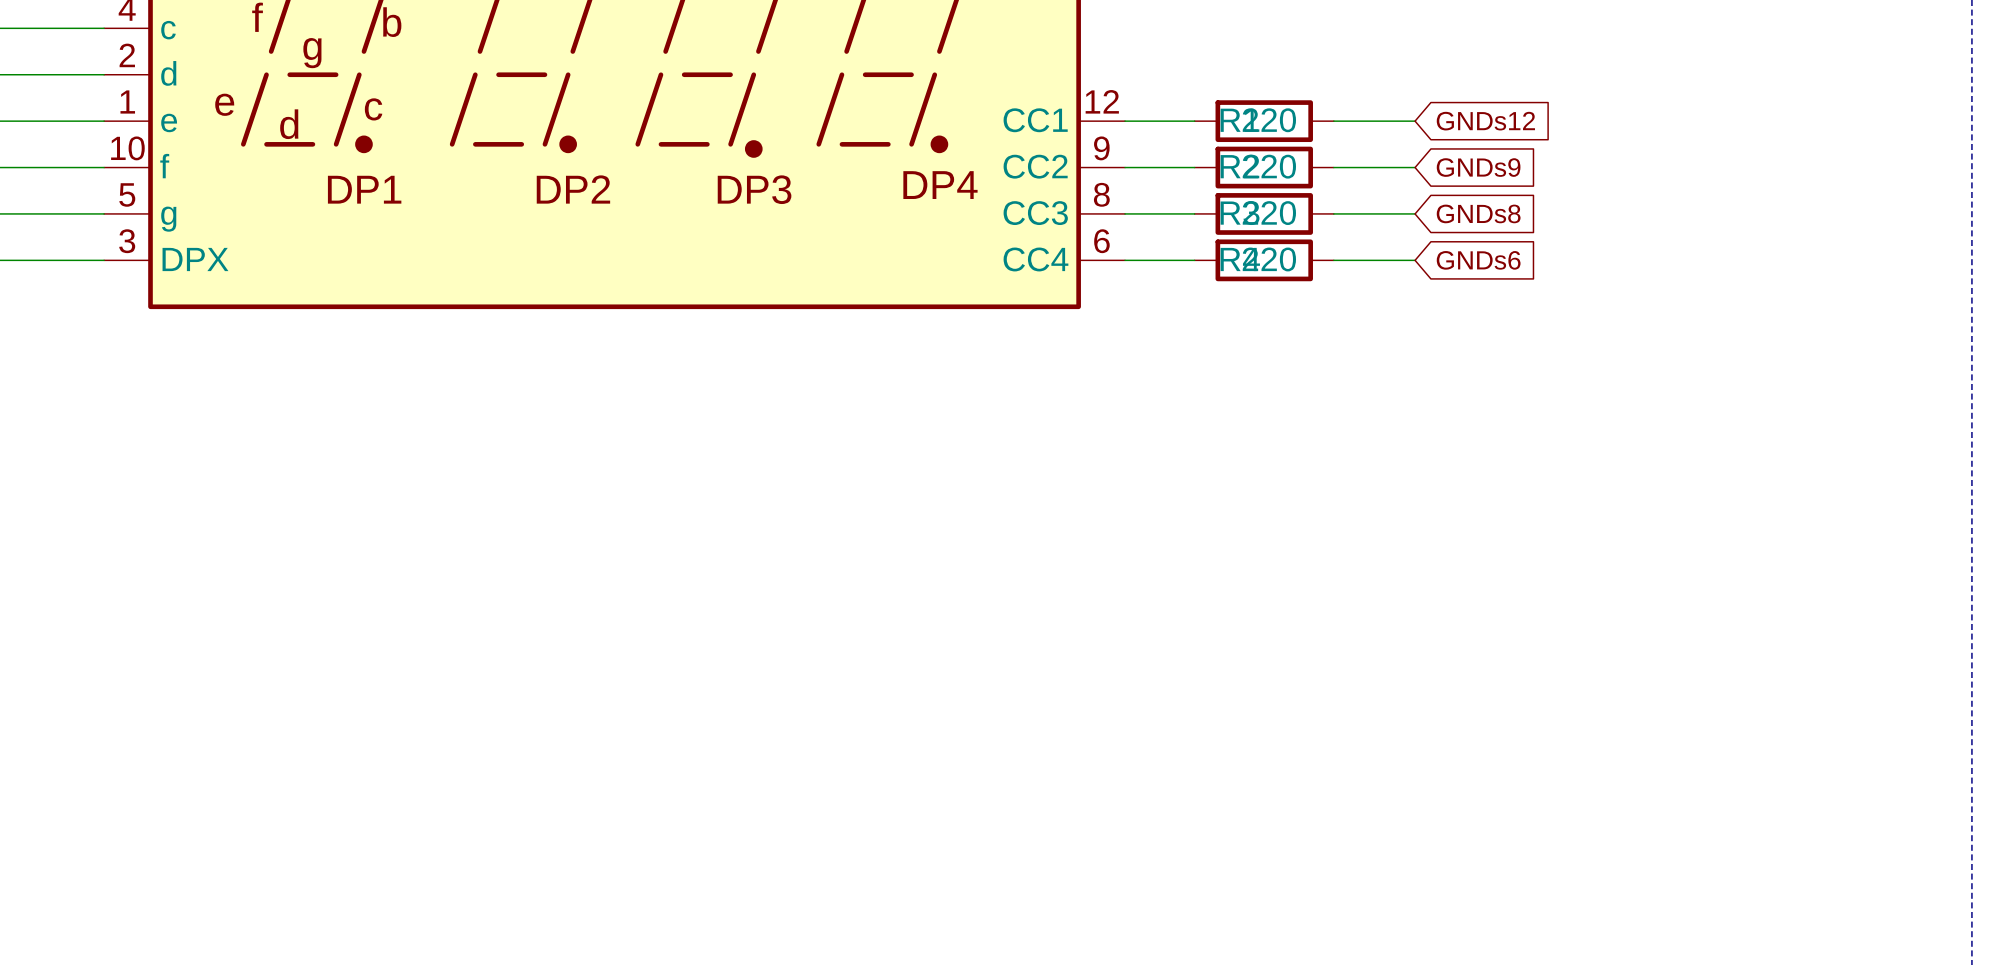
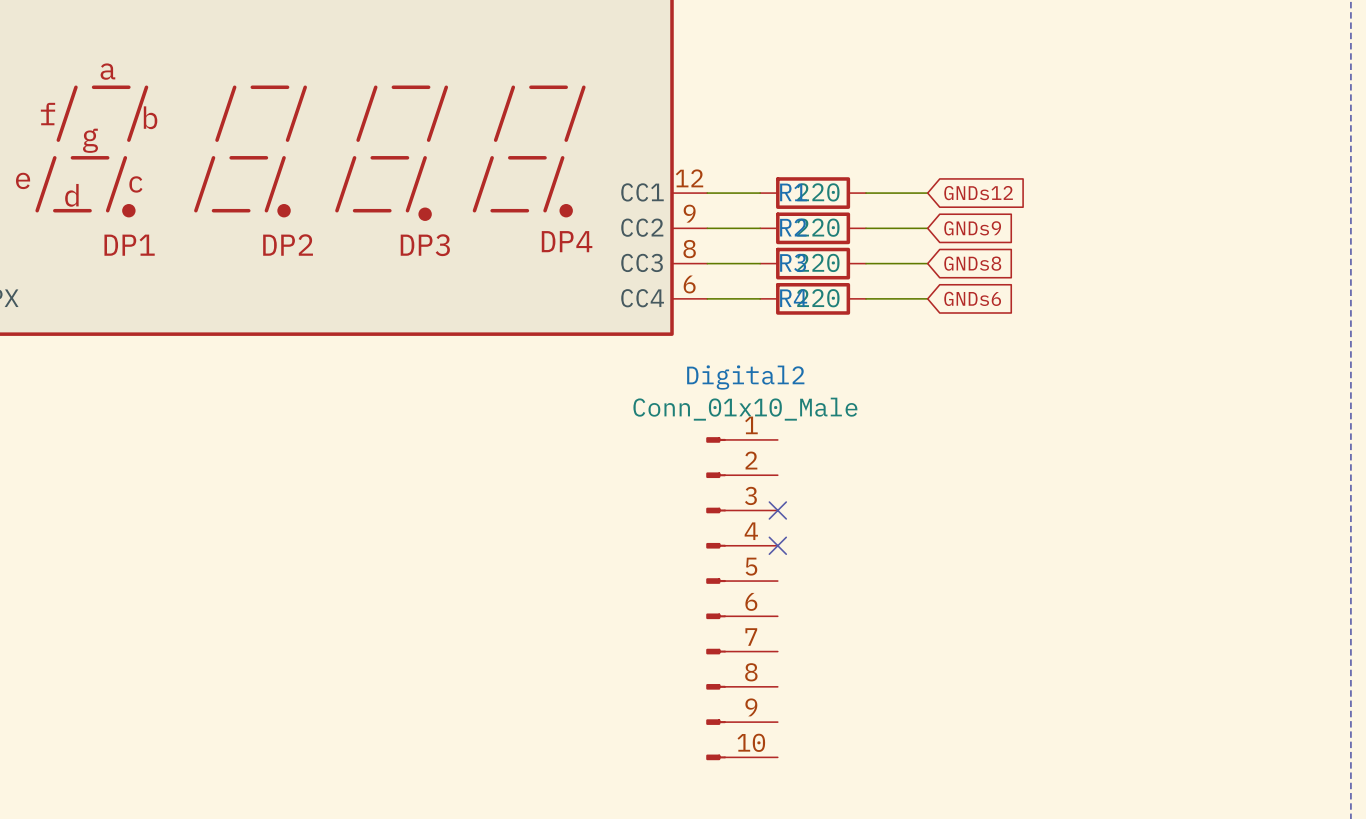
no-connect mark: none -> (777, 510)
no-connect mark: none -> (777, 545)
Digital2: none -> Conn_01x10_Male (742, 598)

